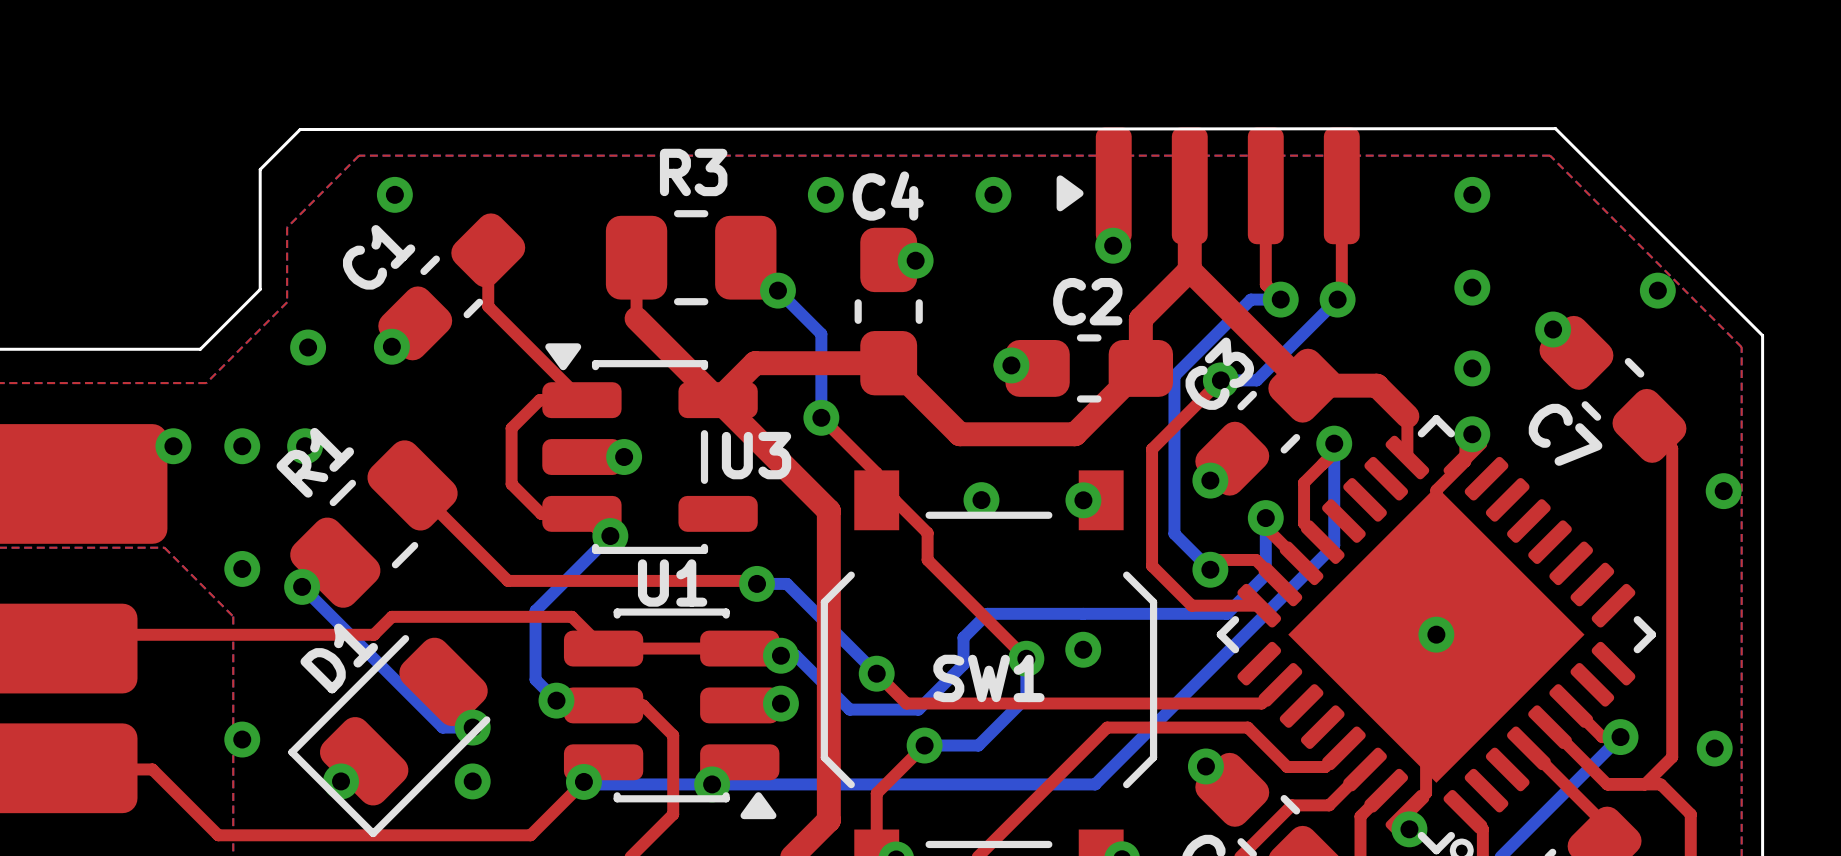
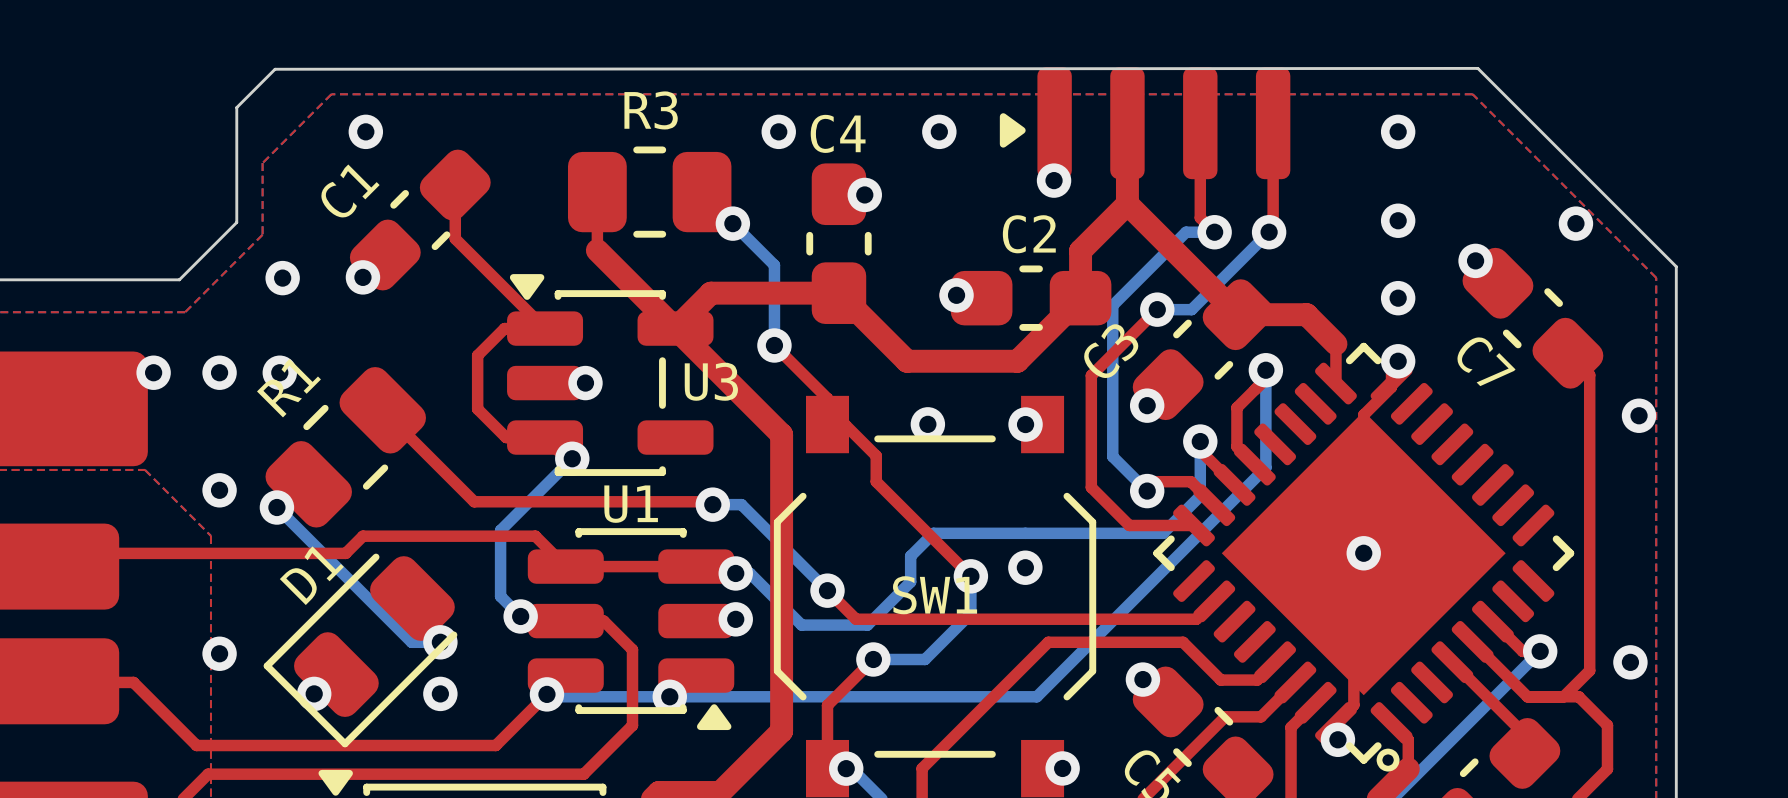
C3 name position: C3 (1219, 373) -> C3 (1111, 351)

